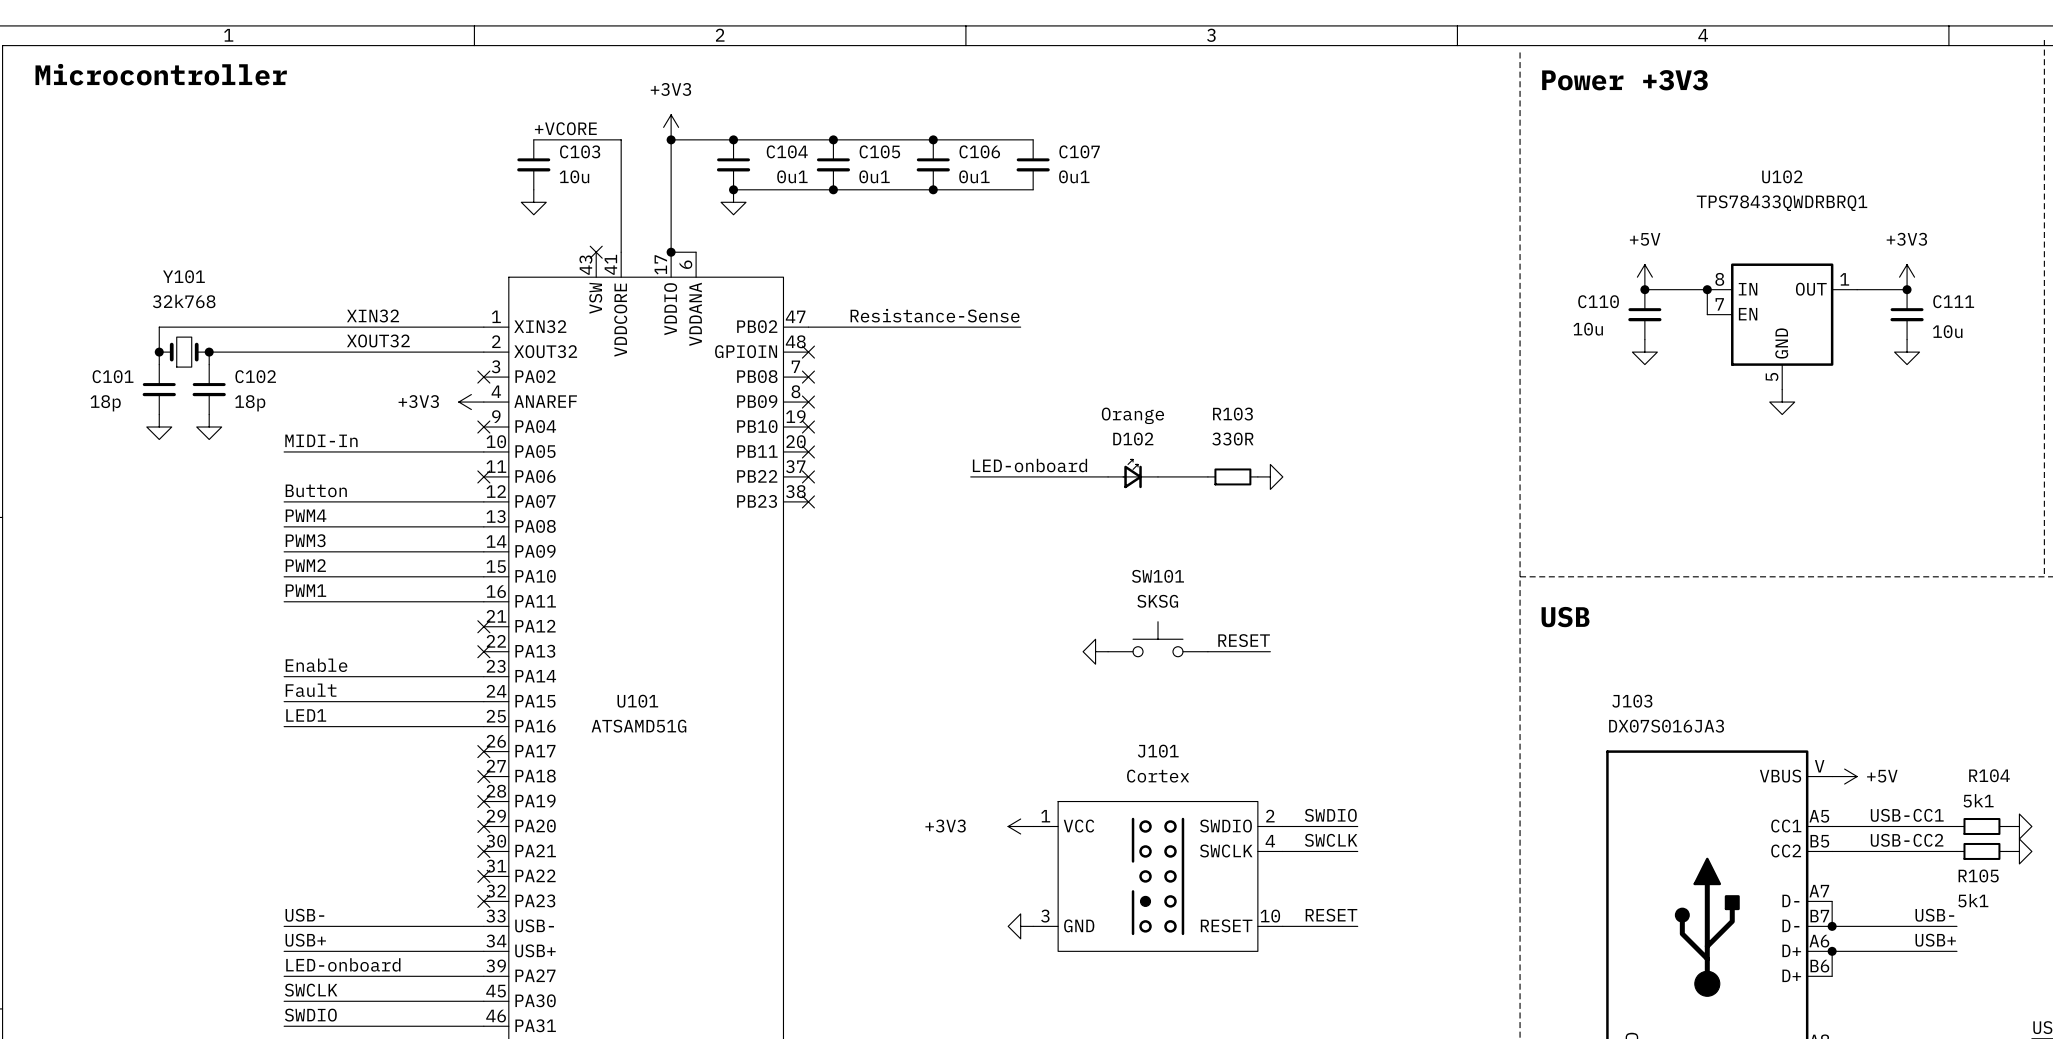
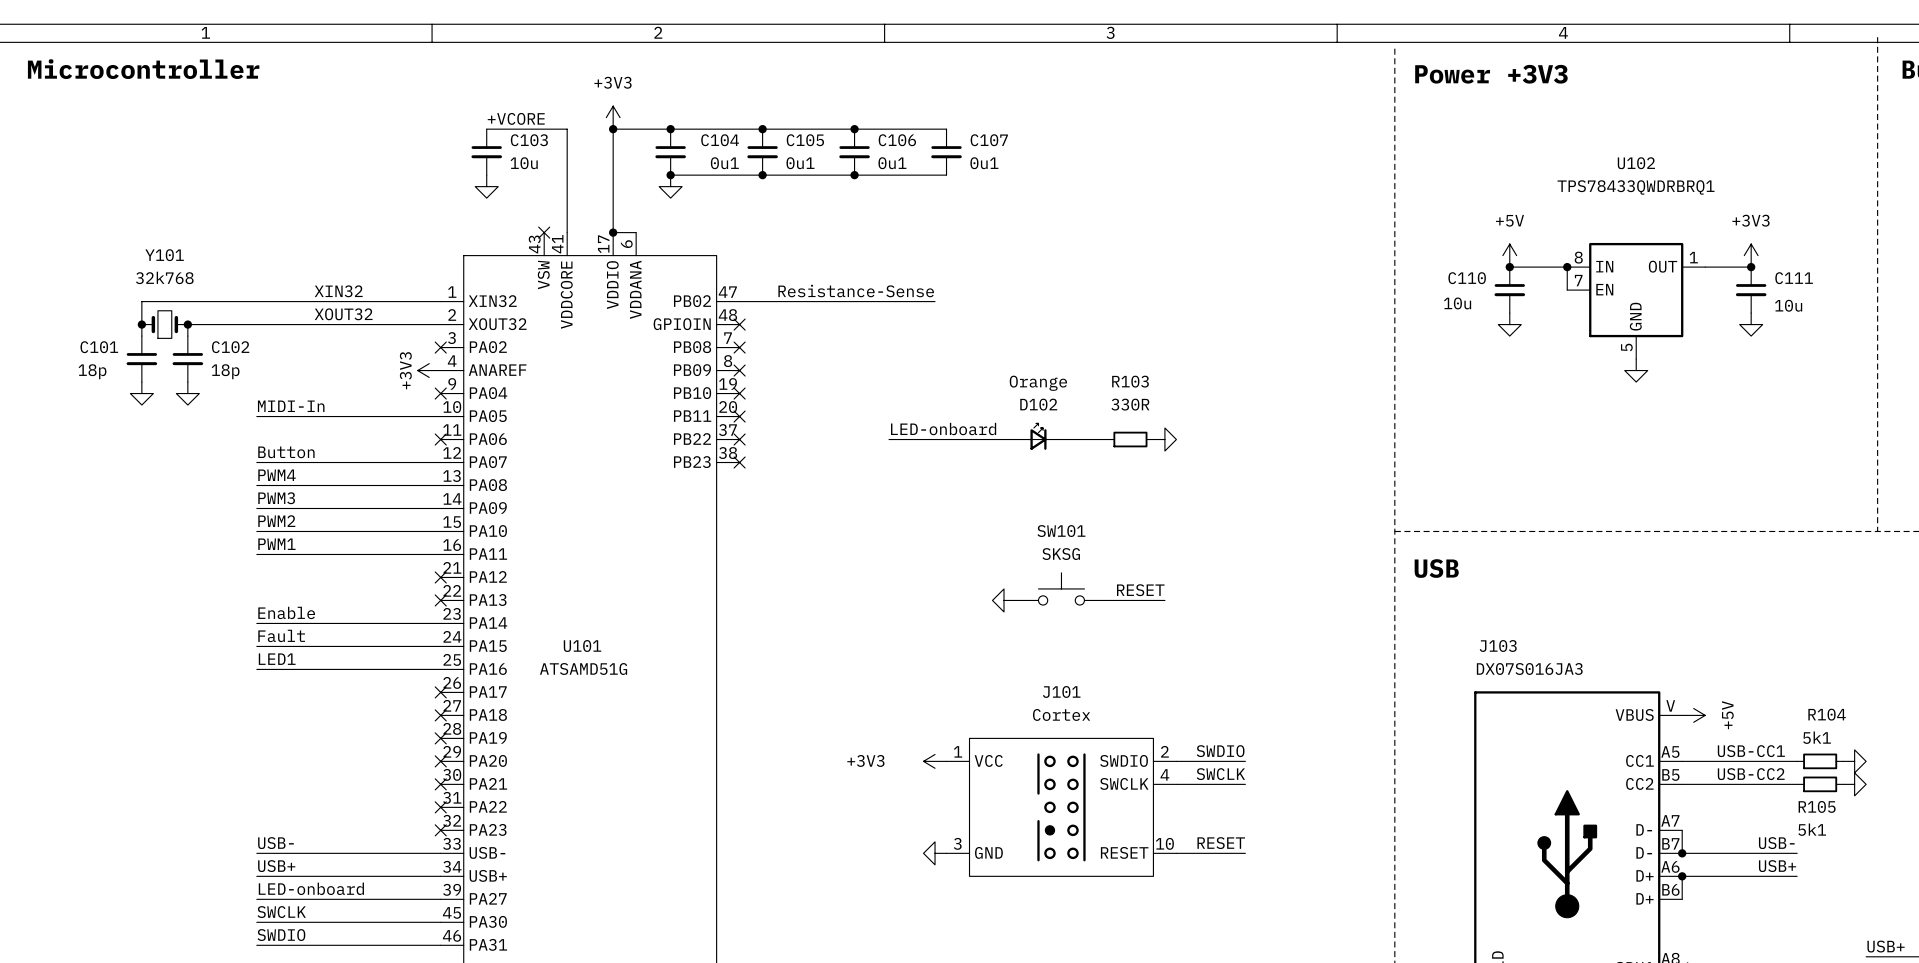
power symbol text rotation: 0° (418, 401) -> 90° counterclockwise (405, 370)
power symbol text rotation: 0° (1882, 776) -> 90° counterclockwise (1727, 715)

